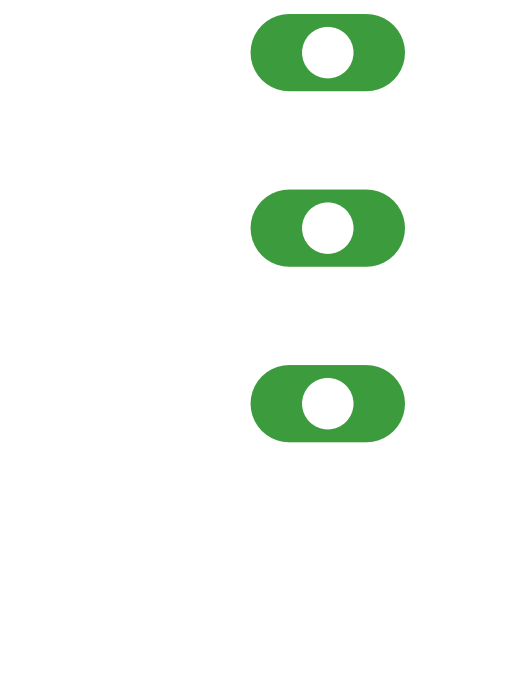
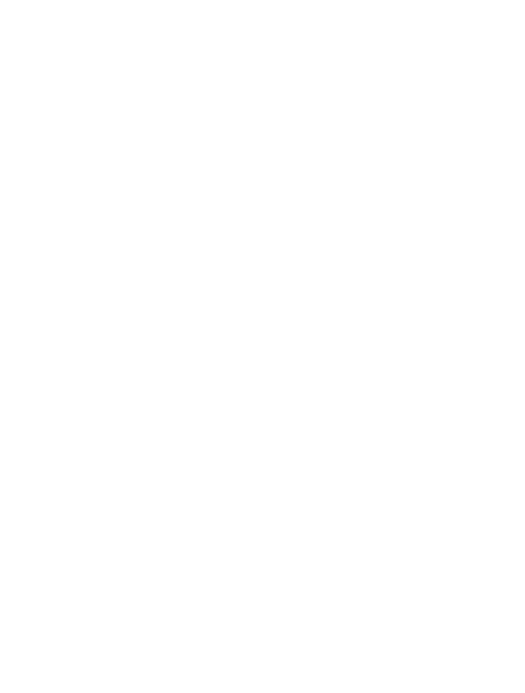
part: (327, 228) -> none

